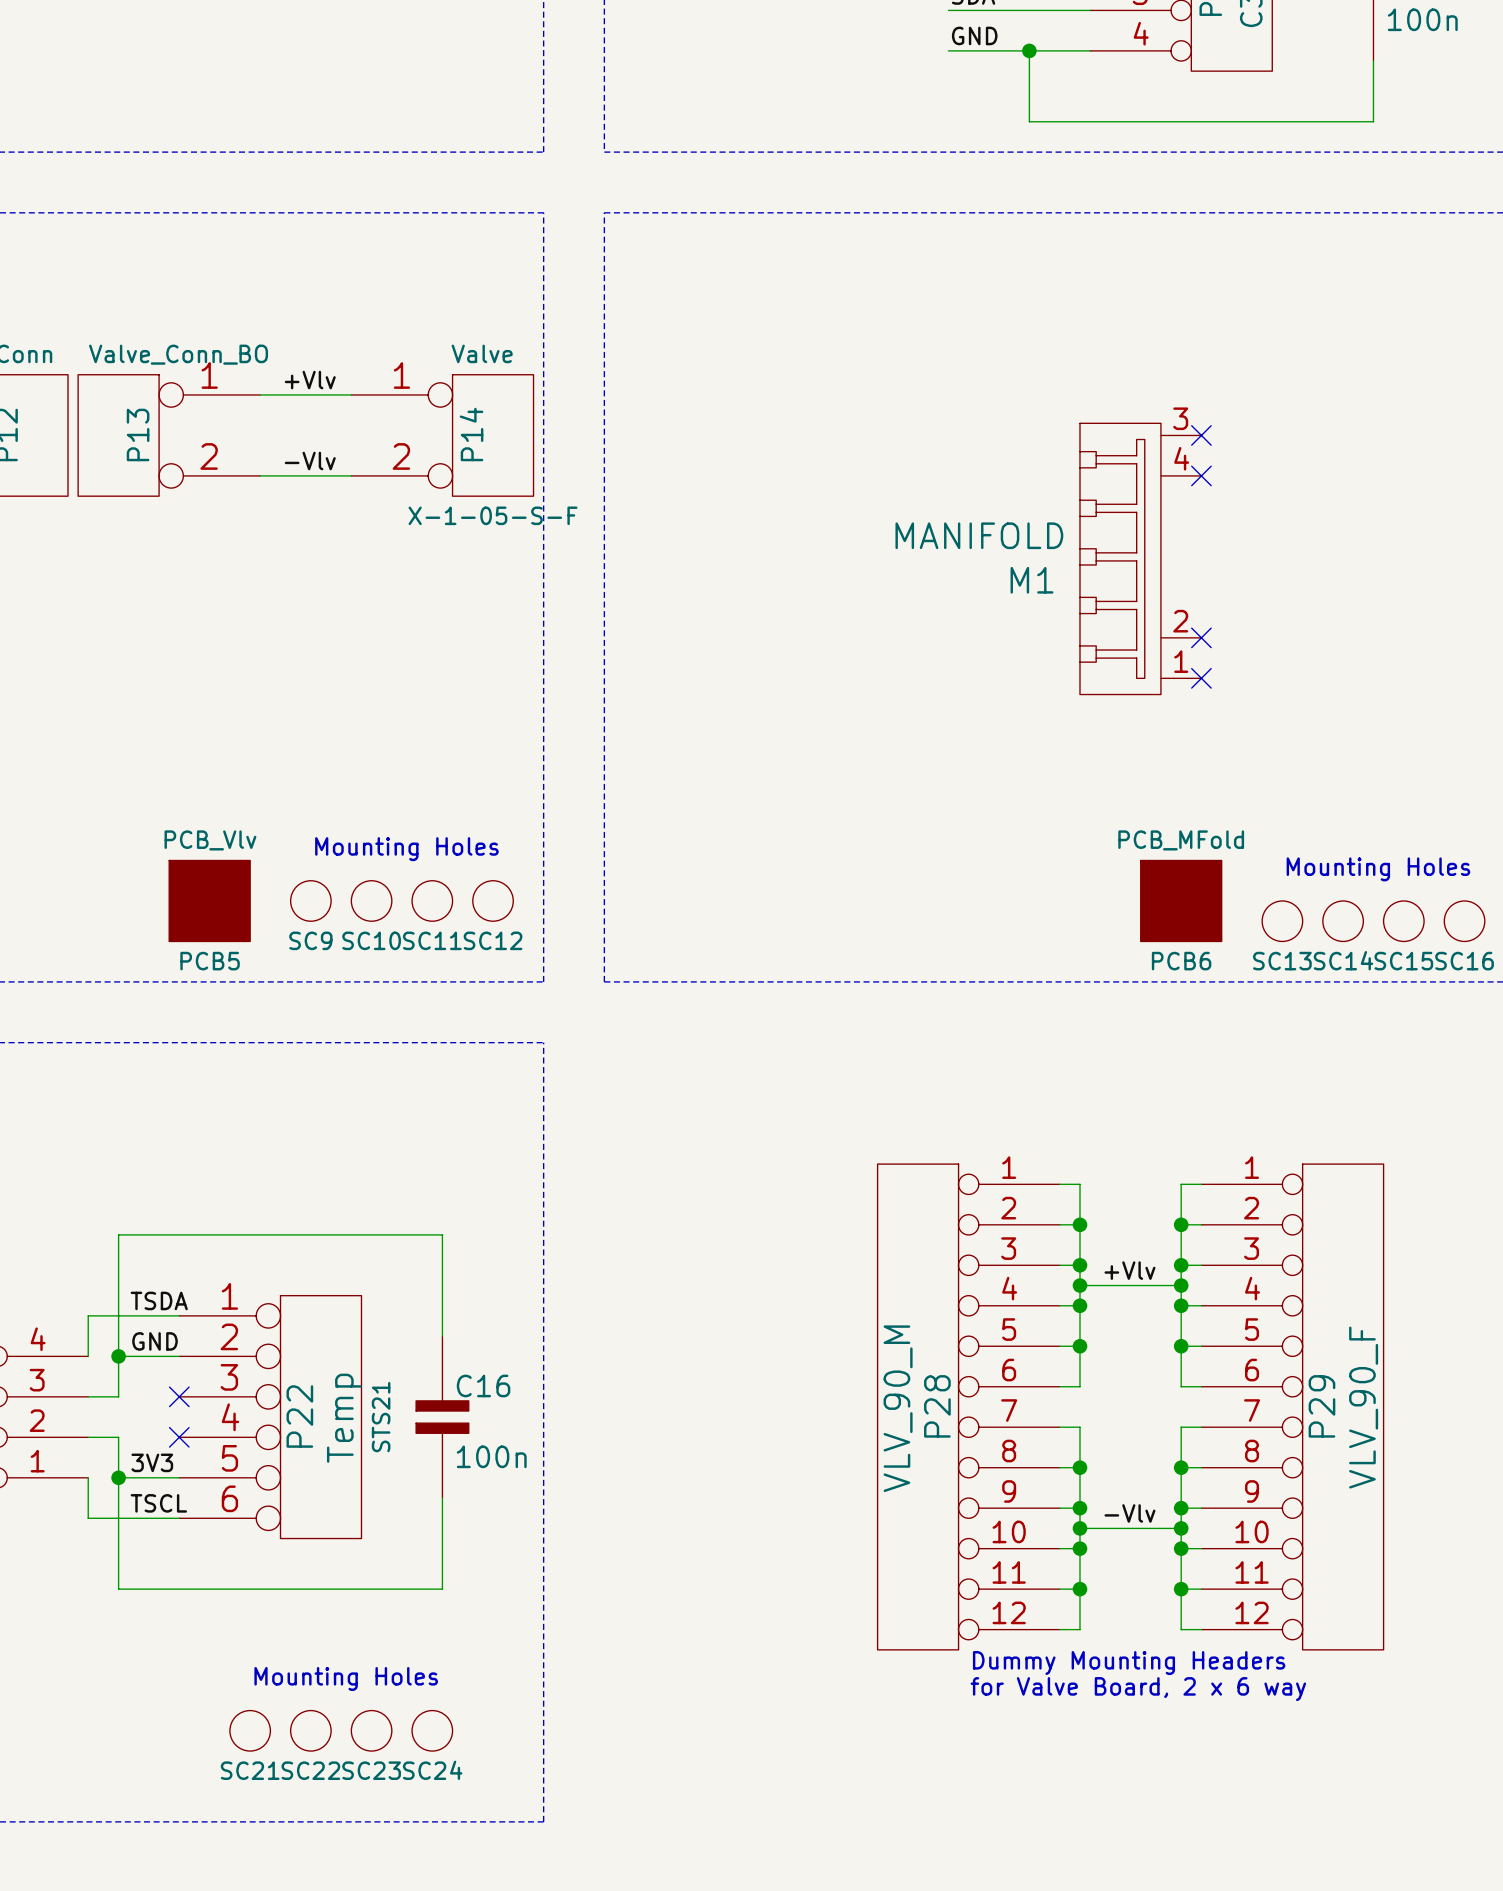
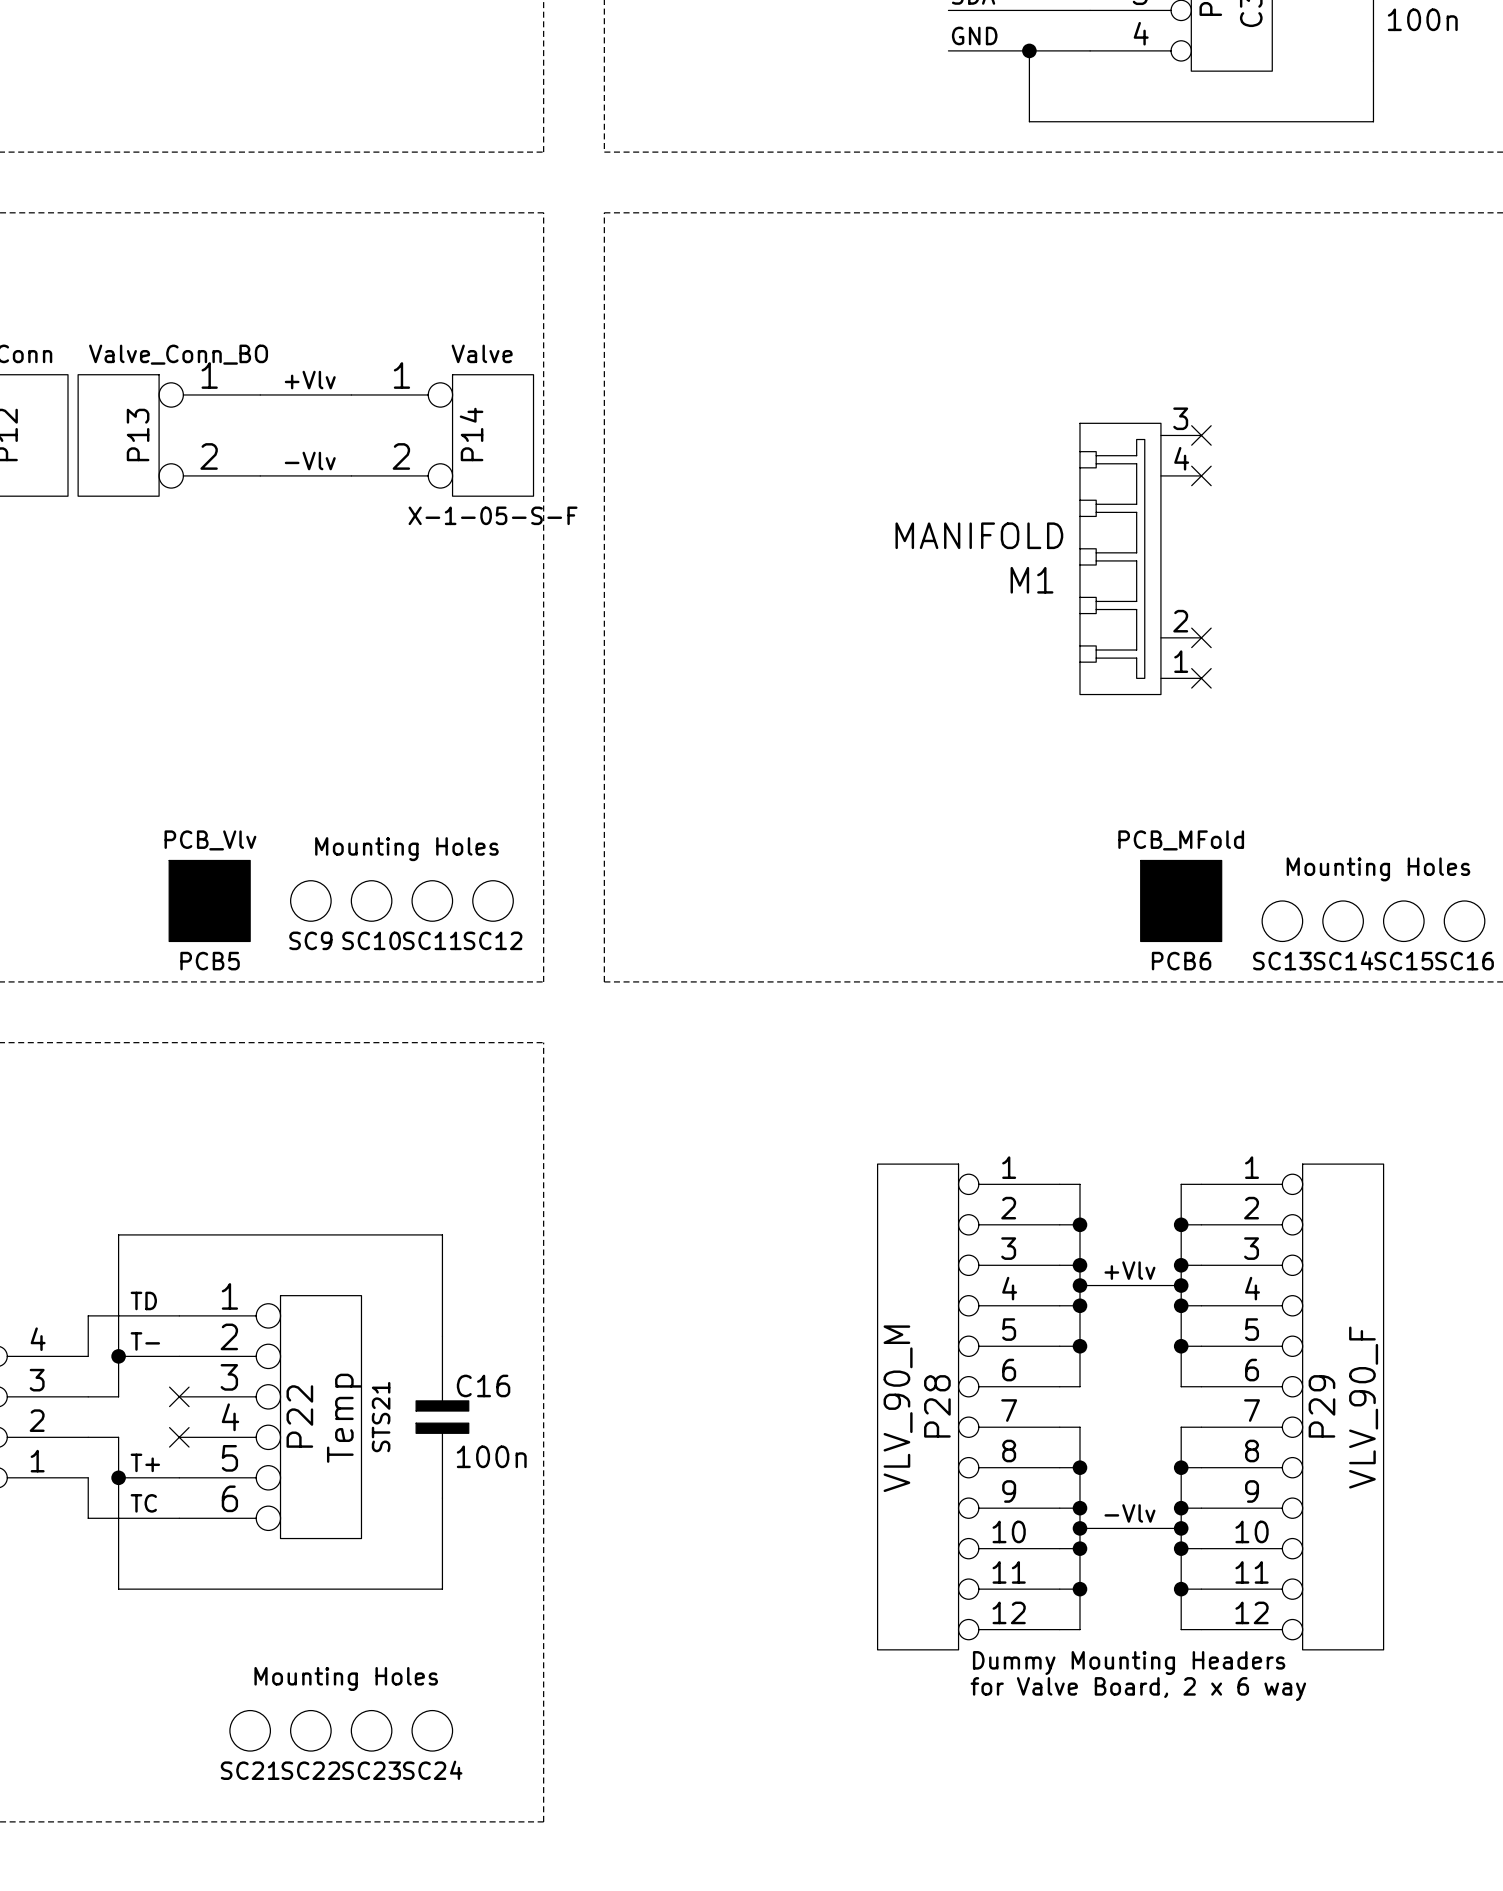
label: TSDA (159, 1300) -> TD (143, 1300)
label: GND (154, 1341) -> T- (145, 1341)
label: 3V3 (152, 1462) -> T+ (145, 1462)
label: TSCL (158, 1503) -> TC (143, 1503)

